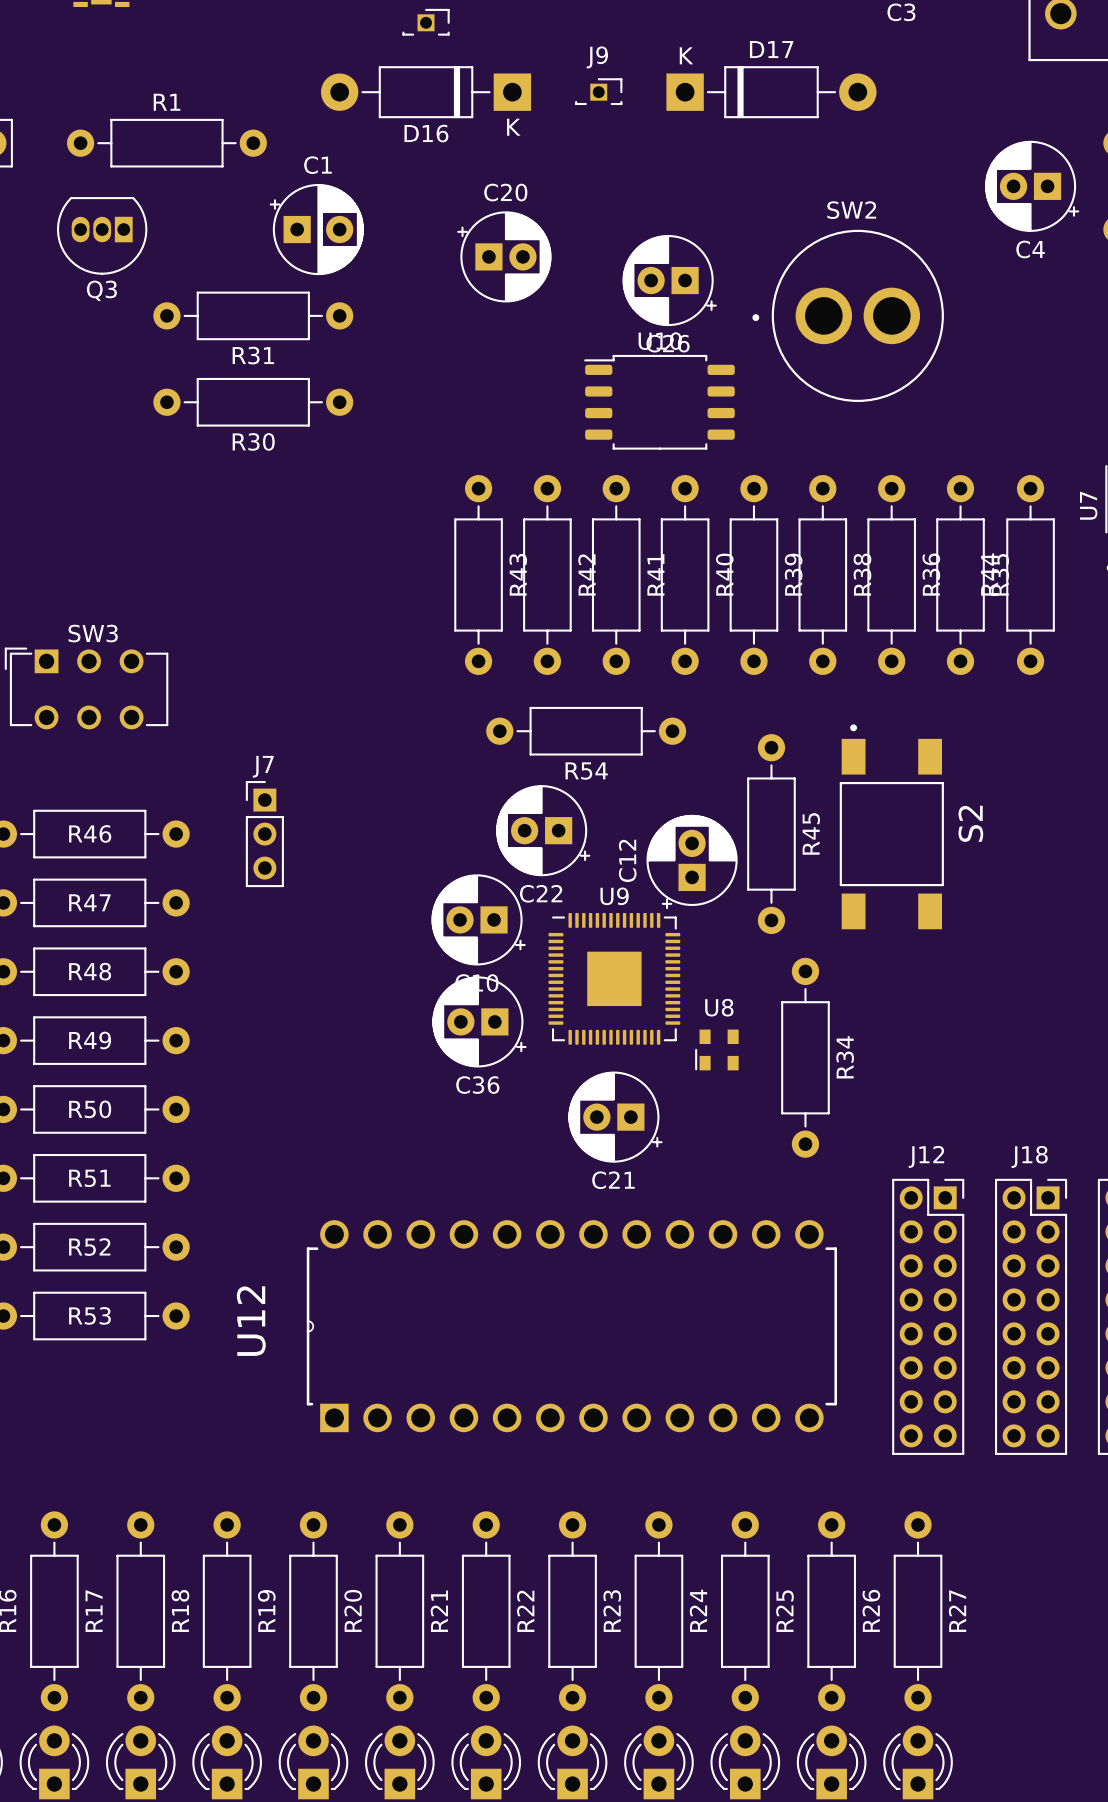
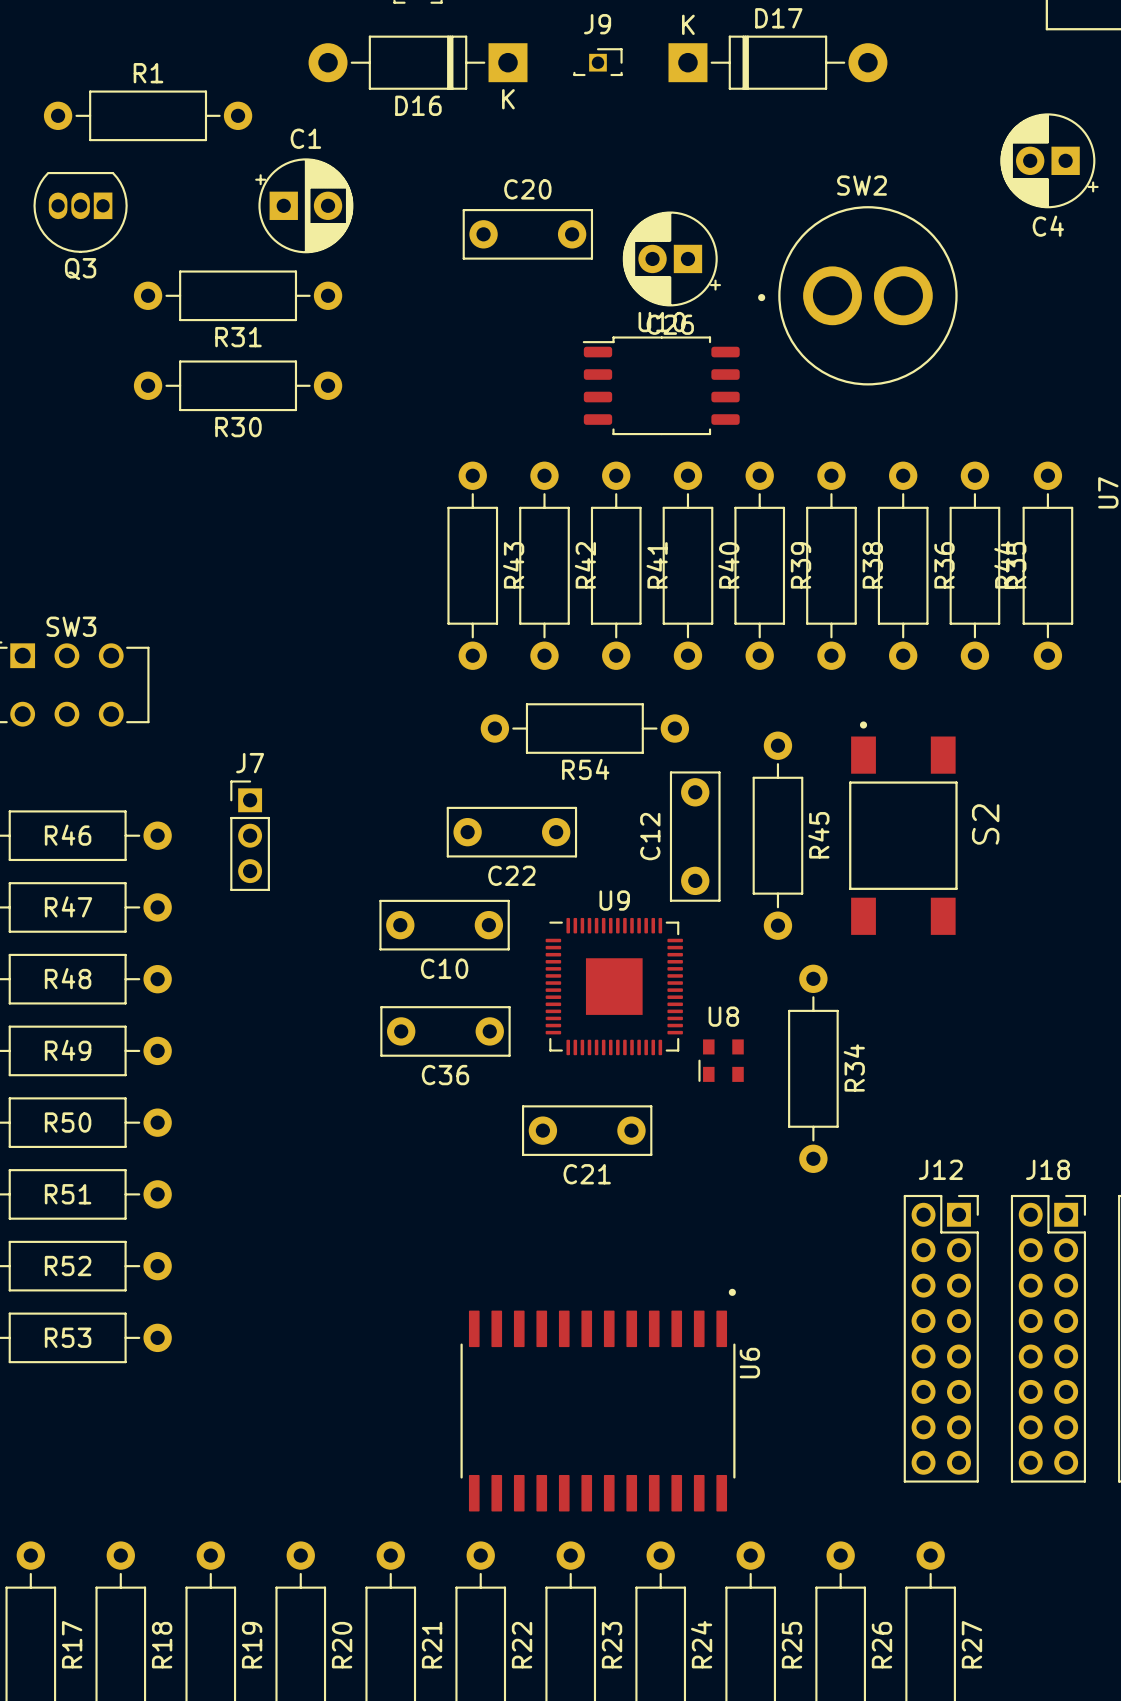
C20 footprint: [457, 211, 552, 303] -> [462, 209, 594, 260]
C22 footprint: [496, 785, 591, 877] -> [446, 806, 578, 858]
C12 footprint: [646, 814, 738, 910] -> [669, 771, 721, 902]
C10 footprint: [431, 874, 526, 966] -> [379, 899, 510, 951]
C36 footprint: [432, 976, 527, 1068] -> [380, 1006, 511, 1057]
C21 footprint: [568, 1071, 663, 1163] -> [522, 1105, 653, 1156]
U12: (571, 1326) -> none
U6: none -> (598, 1400)

